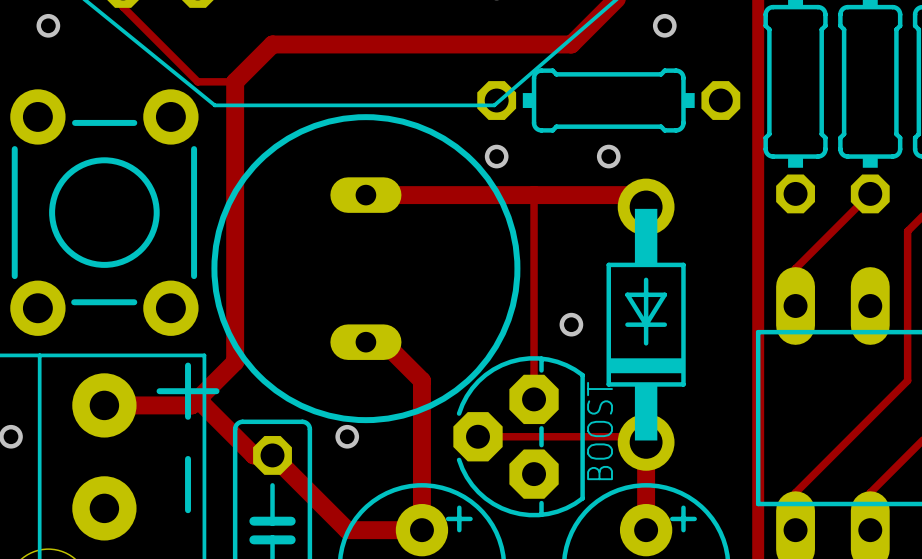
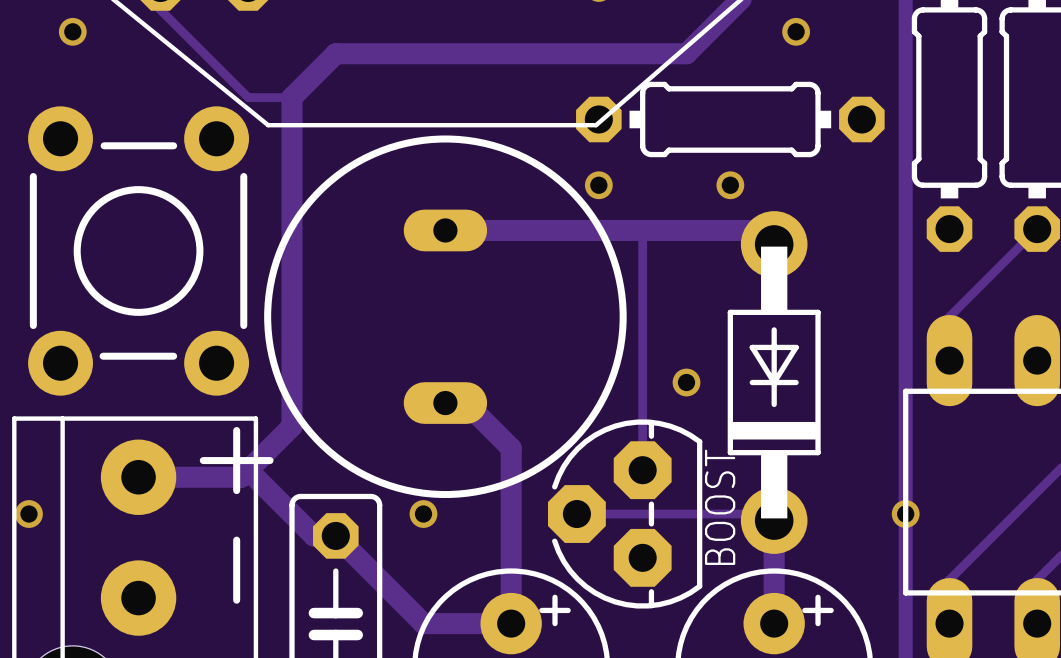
via: none -> (905, 514)

